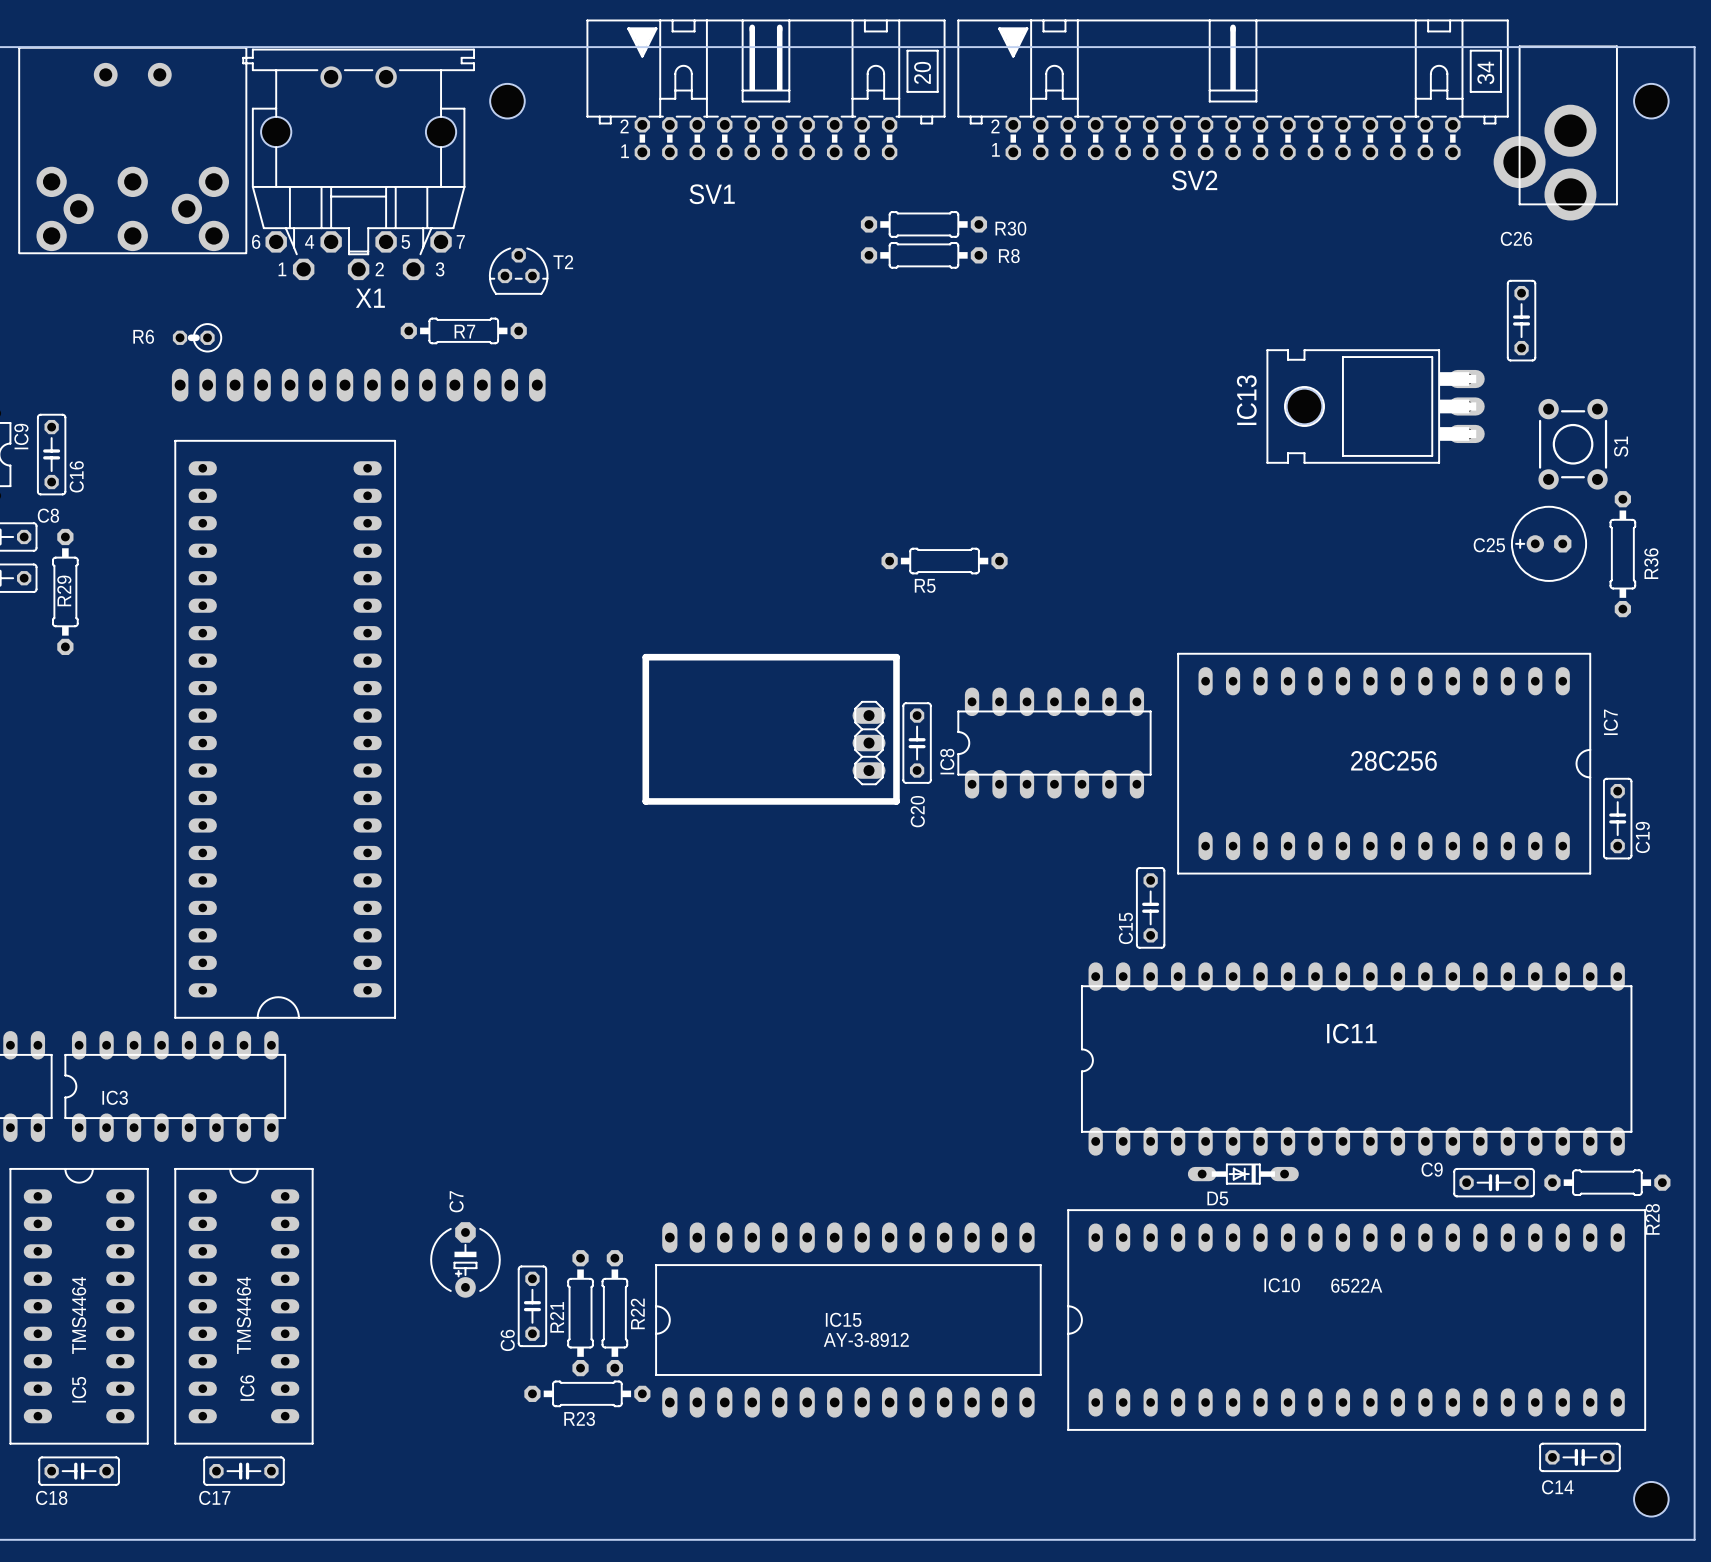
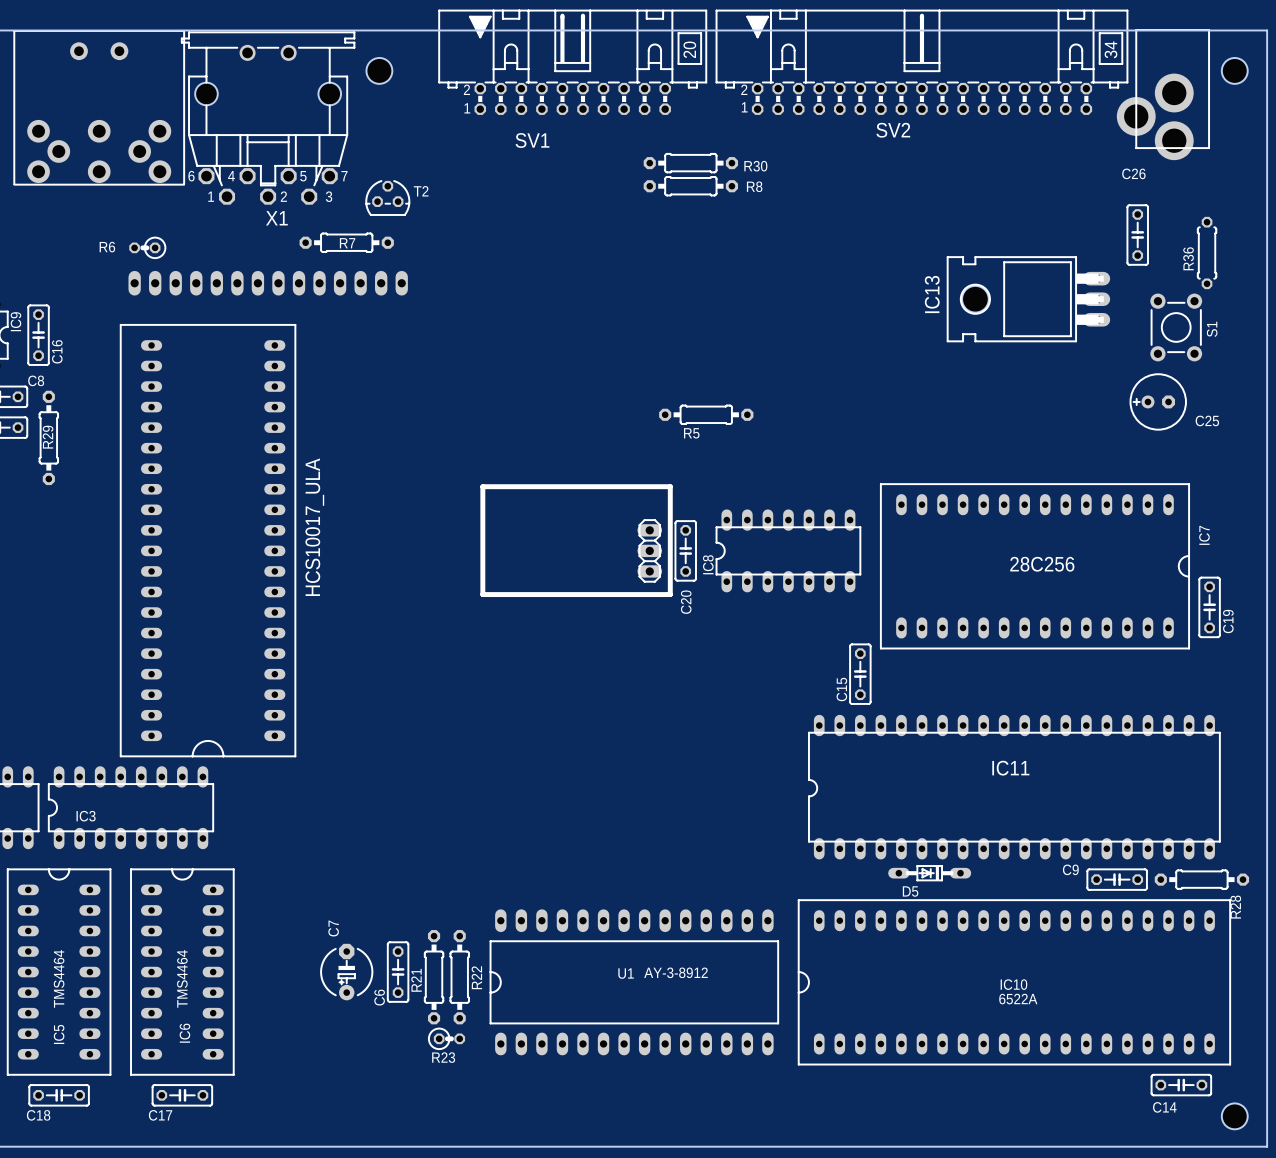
part footprint: [174, 440, 396, 1019] -> [120, 324, 296, 757]
R36 footprint: [1609, 491, 1637, 618] -> [1197, 216, 1217, 290]
C25 name position: C25 (1489, 545) -> C25 (1207, 420)
R36 name position: R36 (1651, 563) -> R36 (1188, 258)
C7 name position: C7 (456, 1201) -> C7 (333, 928)
C7 position: (465, 1259) -> (346, 972)
IC10 name position: IC10 (1282, 1285) -> IC10 (1013, 984)
IC10 value position: 6522A (1356, 1285) -> 6522A (1018, 999)
IC15 name: IC15 (843, 1319) -> U1 (626, 973)
IC15 value position: AY-3-8912 (866, 1339) -> AY-3-8912 (675, 972)
R23 footprint: [524, 1380, 651, 1408] -> [428, 1027, 466, 1050]

